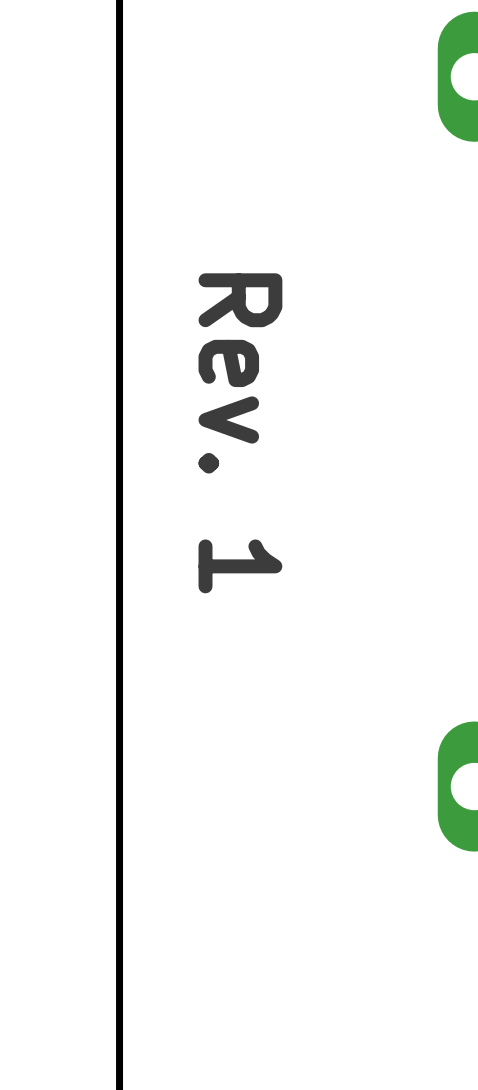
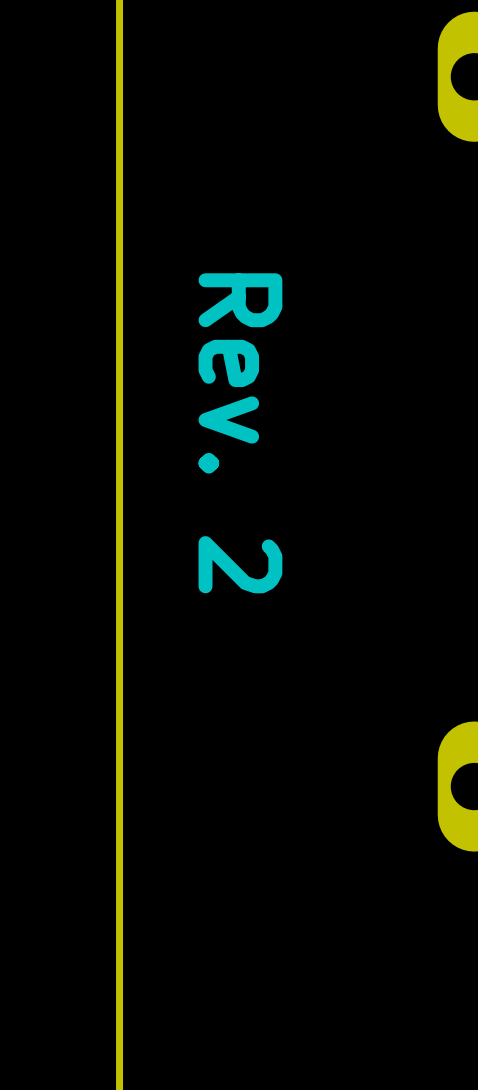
text: Rev. 1 (240, 433) -> Rev. 2 (240, 433)

